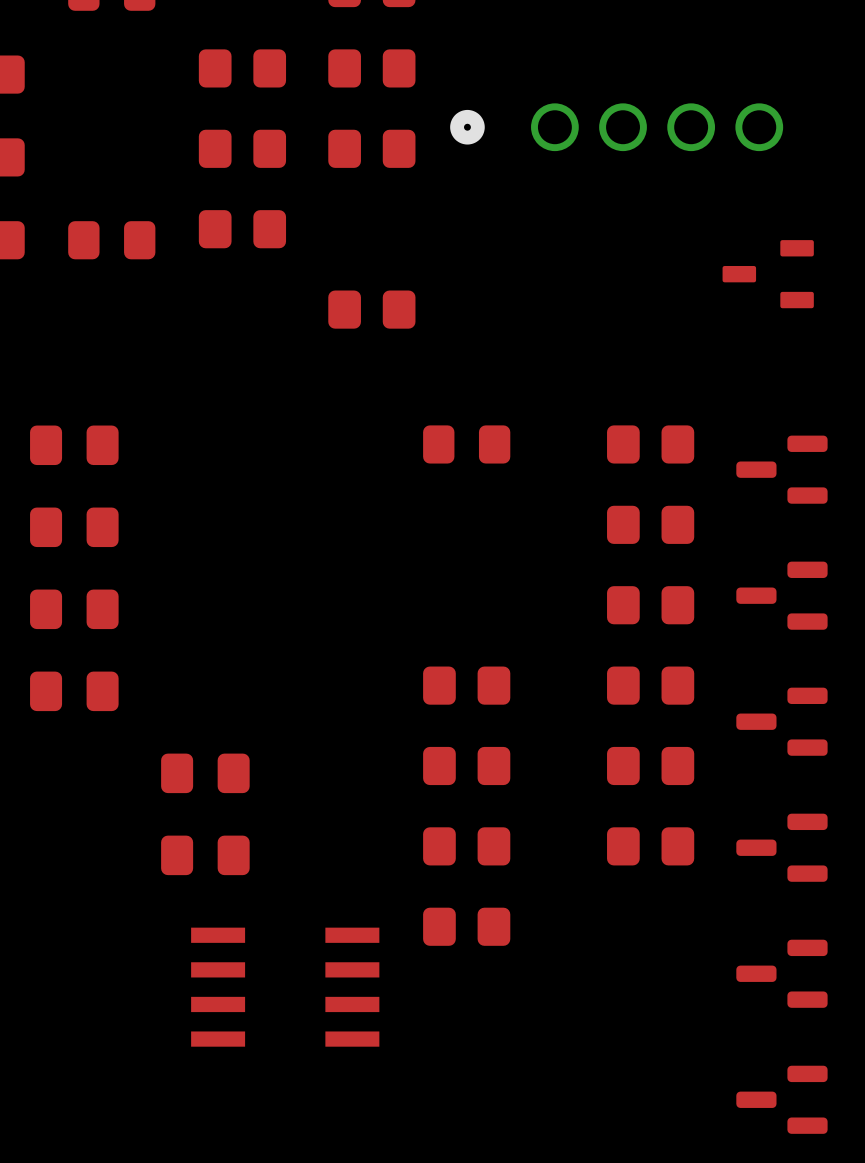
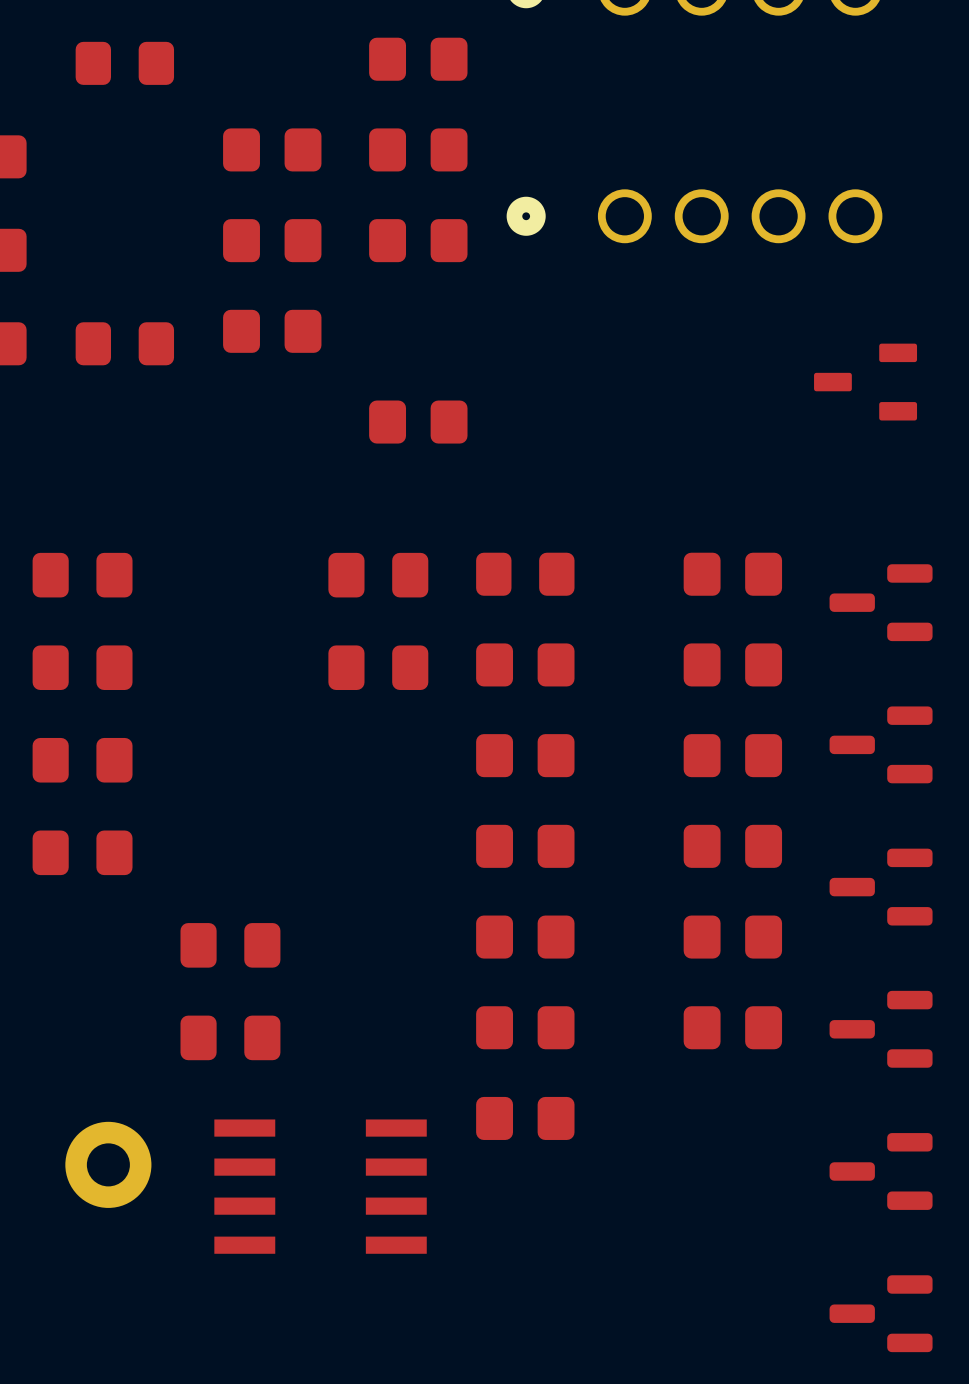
part: none -> (378, 575)
part: none -> (525, 664)
part: none -> (378, 667)
part: none -> (525, 755)
part: none -> (108, 1164)

